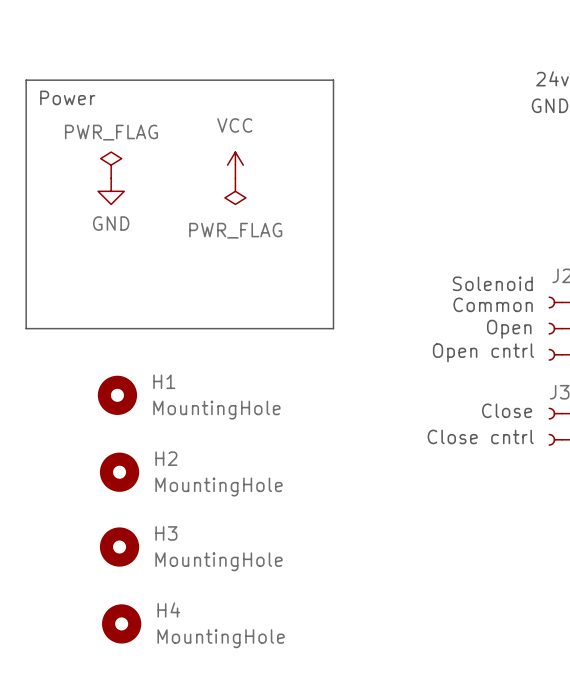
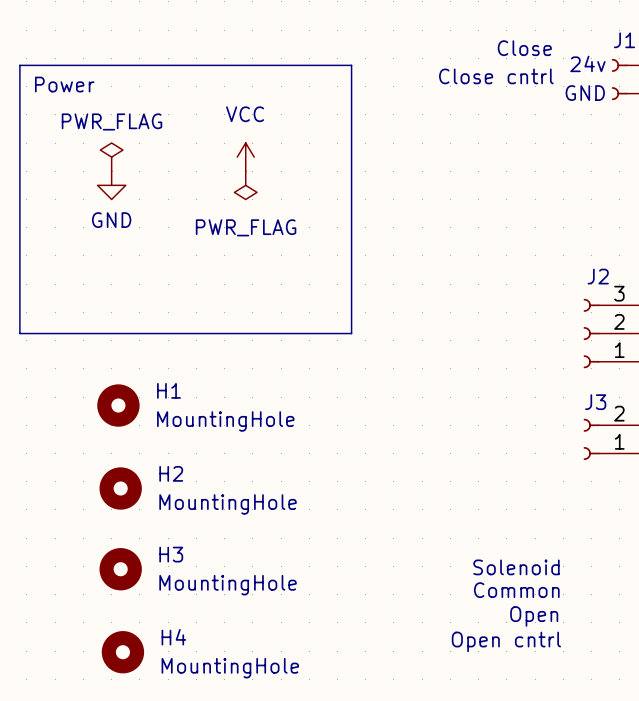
text: none -> Close (524, 48)
text: none -> Close cntrl (496, 76)
text: Solenoid (492, 283) -> none
text: Common (493, 304) -> none
text: Open (509, 329) -> none
text: Open cntrl (483, 352) -> none
text: Close (507, 410) -> none
text: Close cntrl (480, 436) -> none
text: none -> Solenoid (516, 567)
text: none -> Common (516, 590)
text: none -> Open (534, 616)
text: none -> Open cntrl (506, 641)

